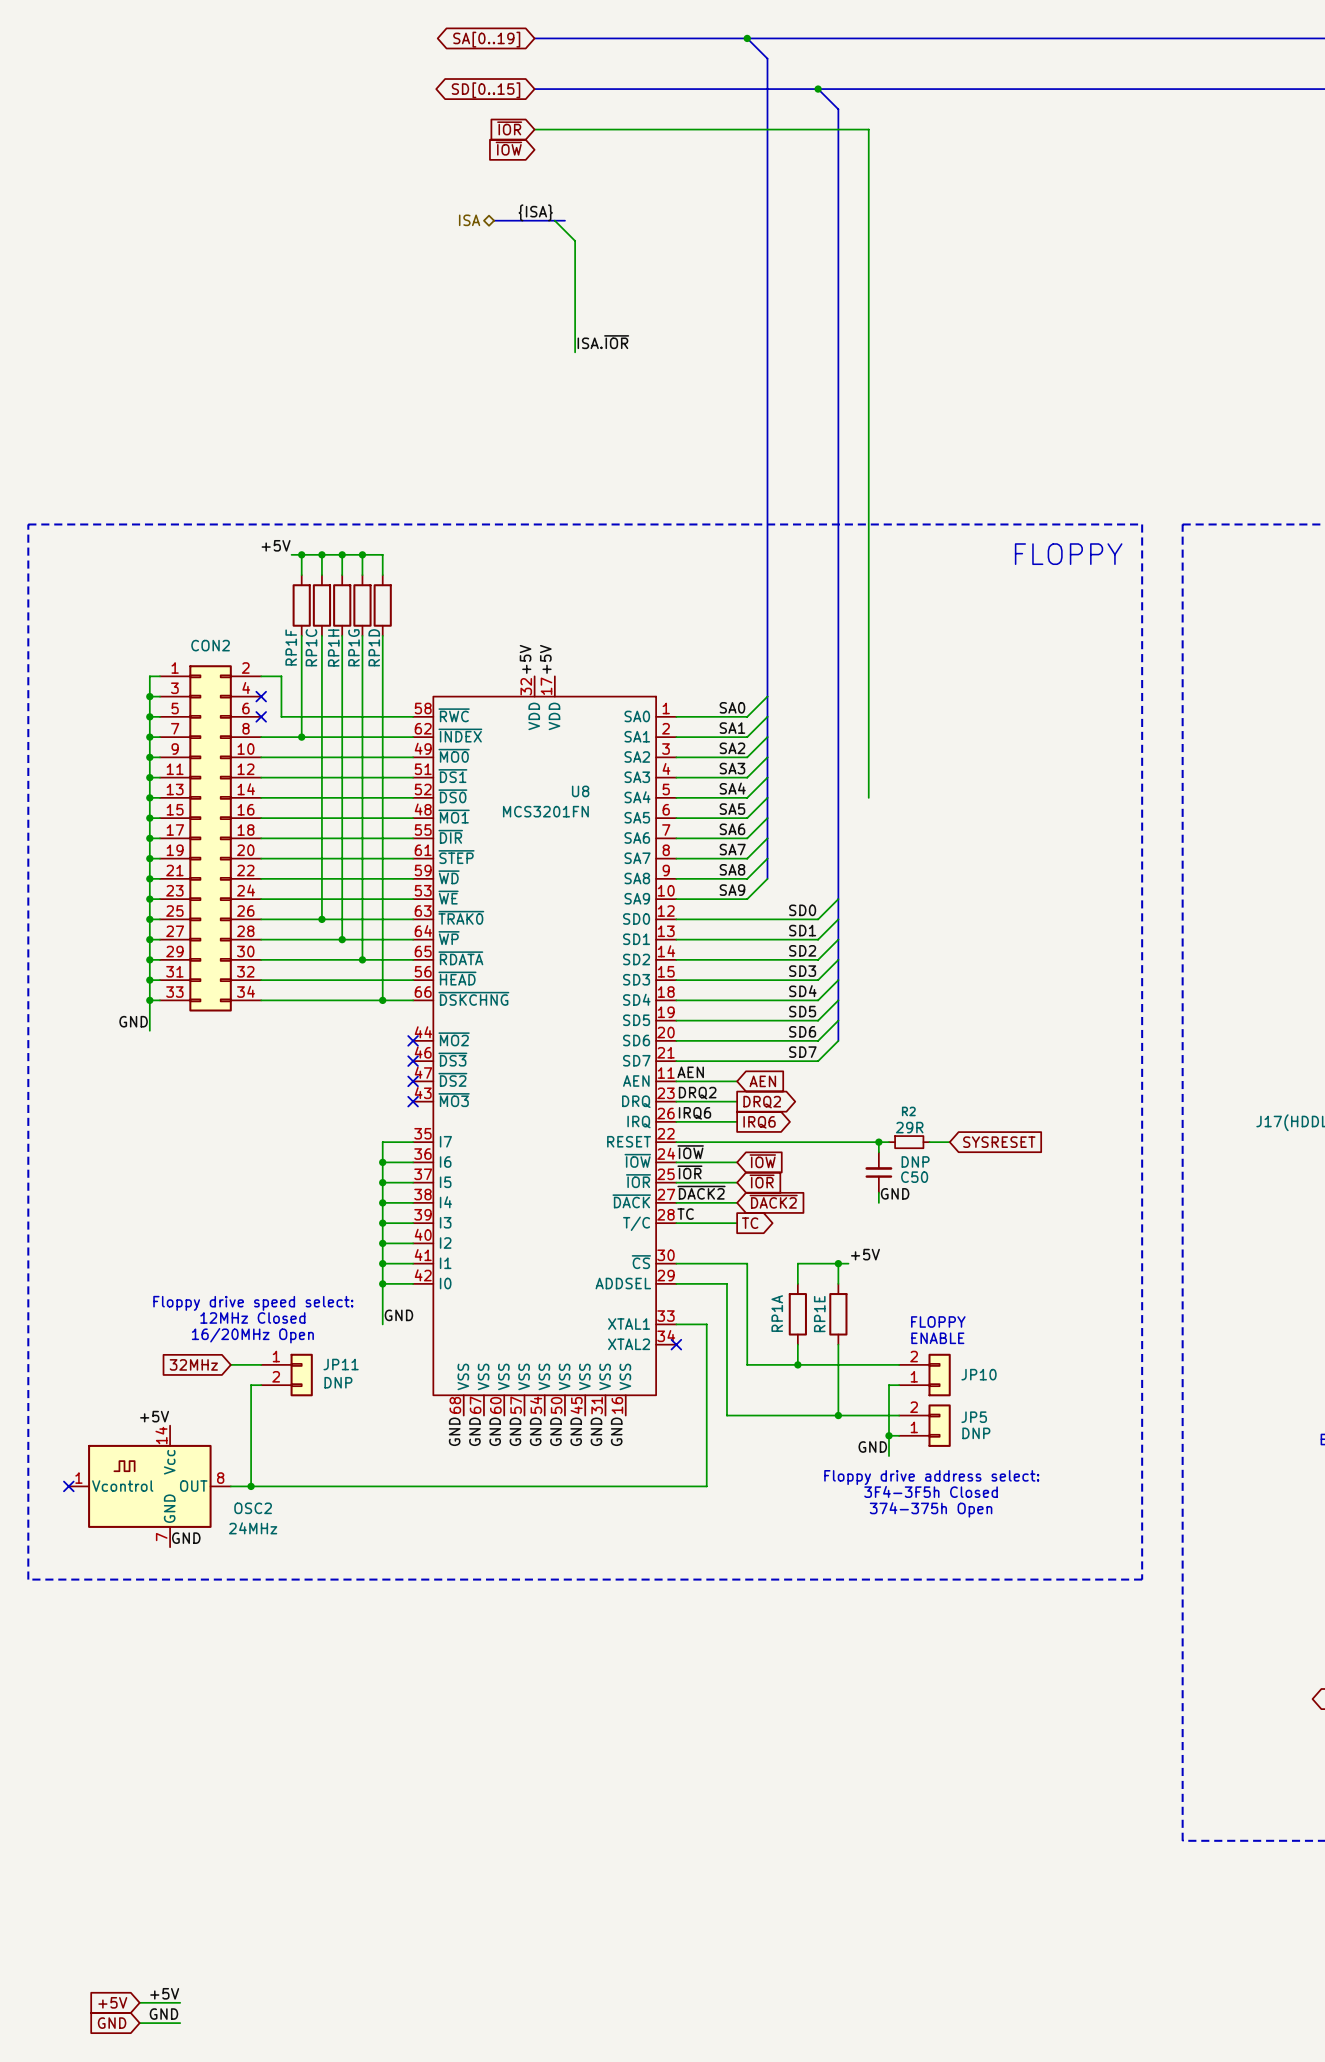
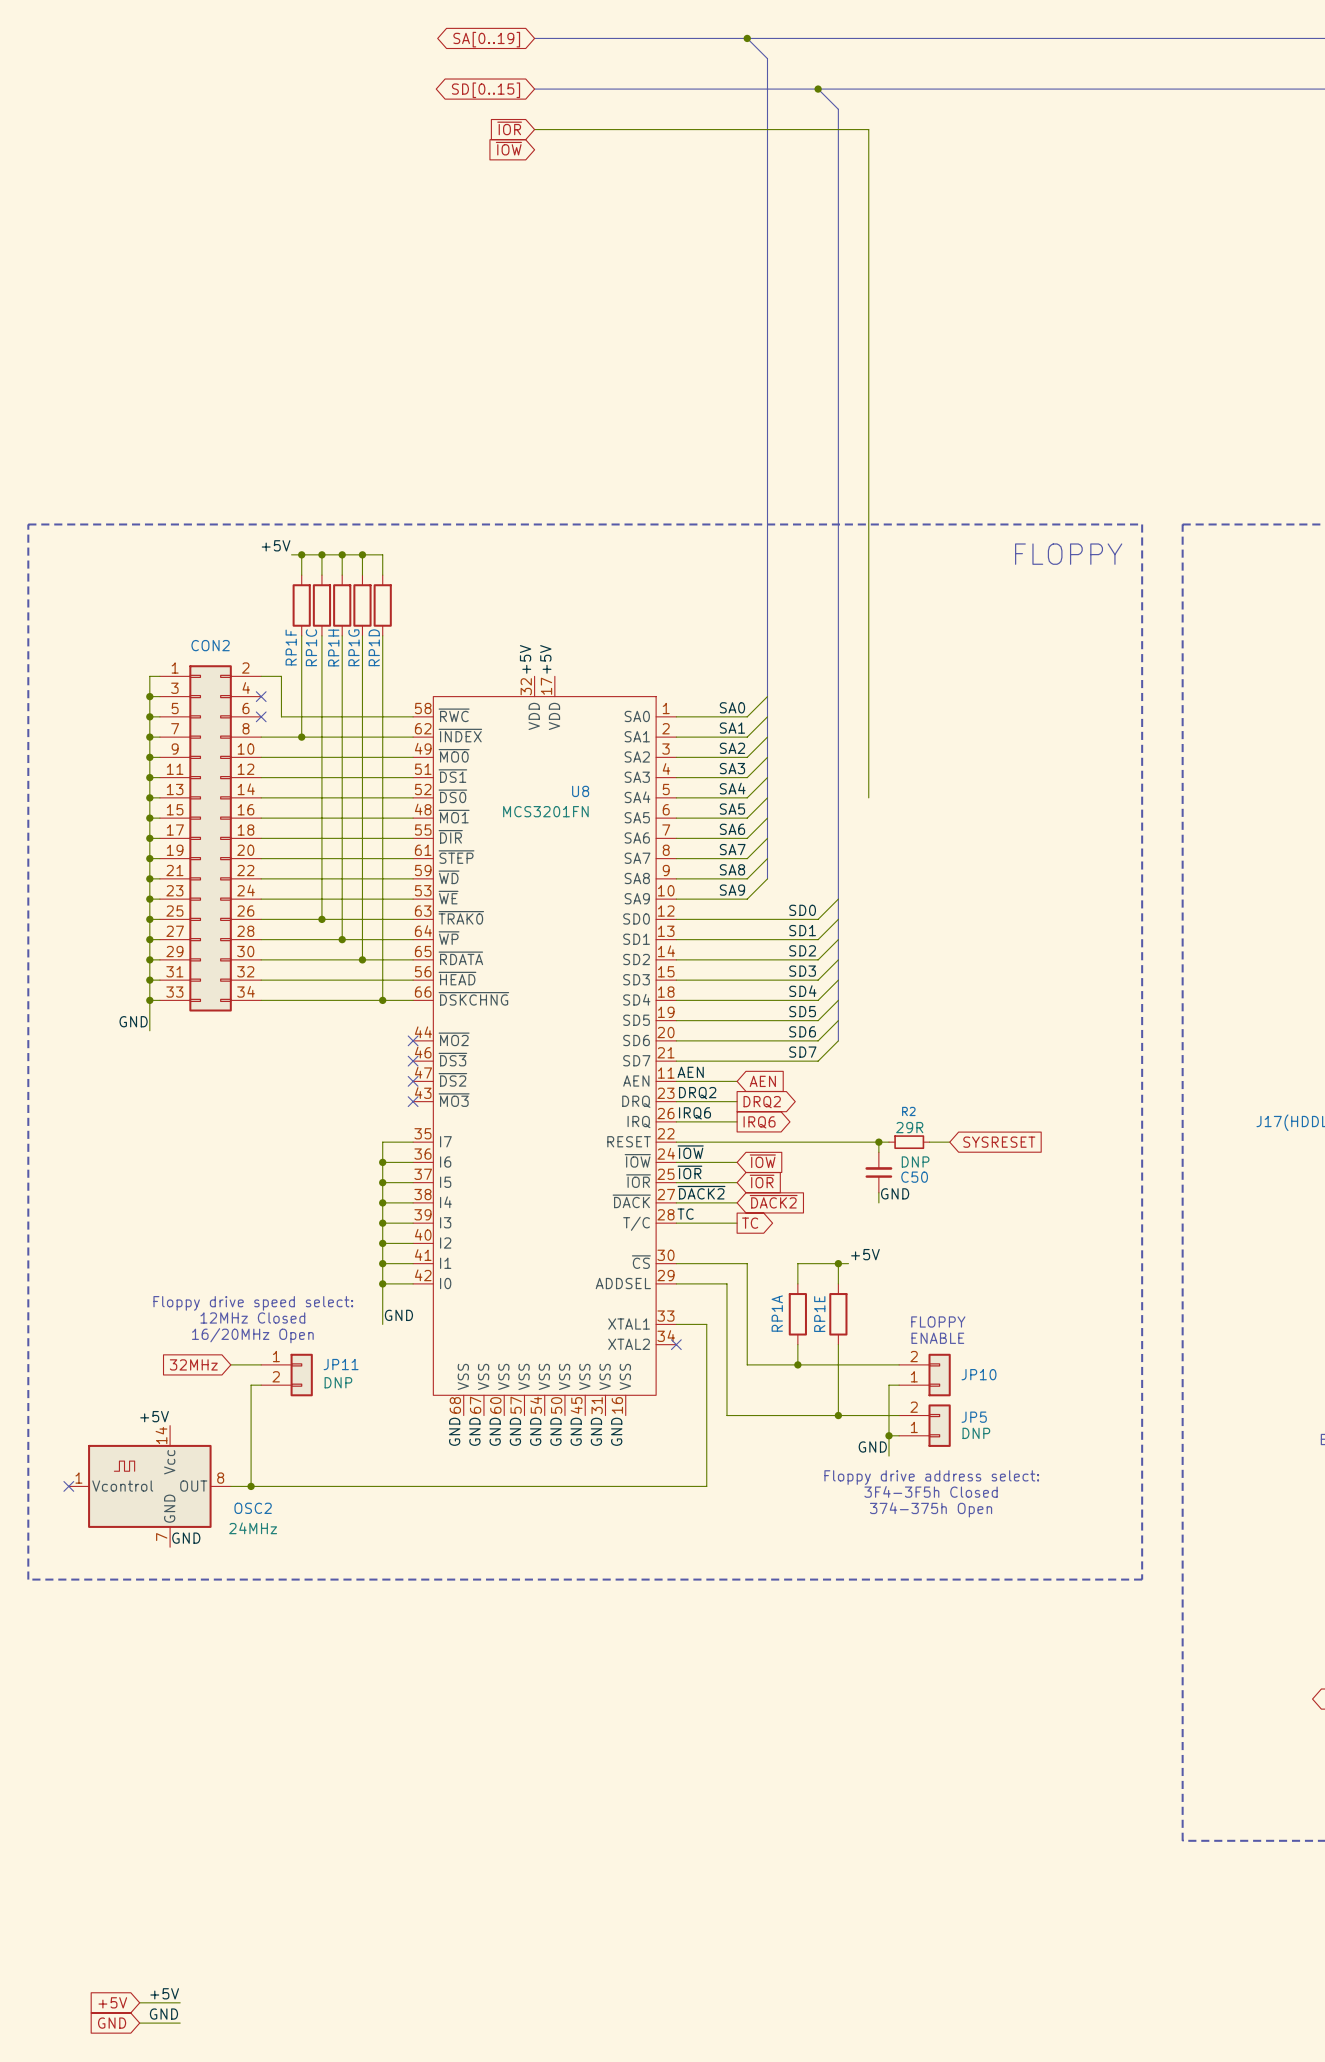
label: {ISA} (535, 212) -> none
hierarchical label: ISA (469, 220) -> none
bus: (494, 220) (564, 220) -> none
wire: (554, 220) (575, 240) (575, 352) -> none
label: ISA.~{IOR} (603, 342) -> none

